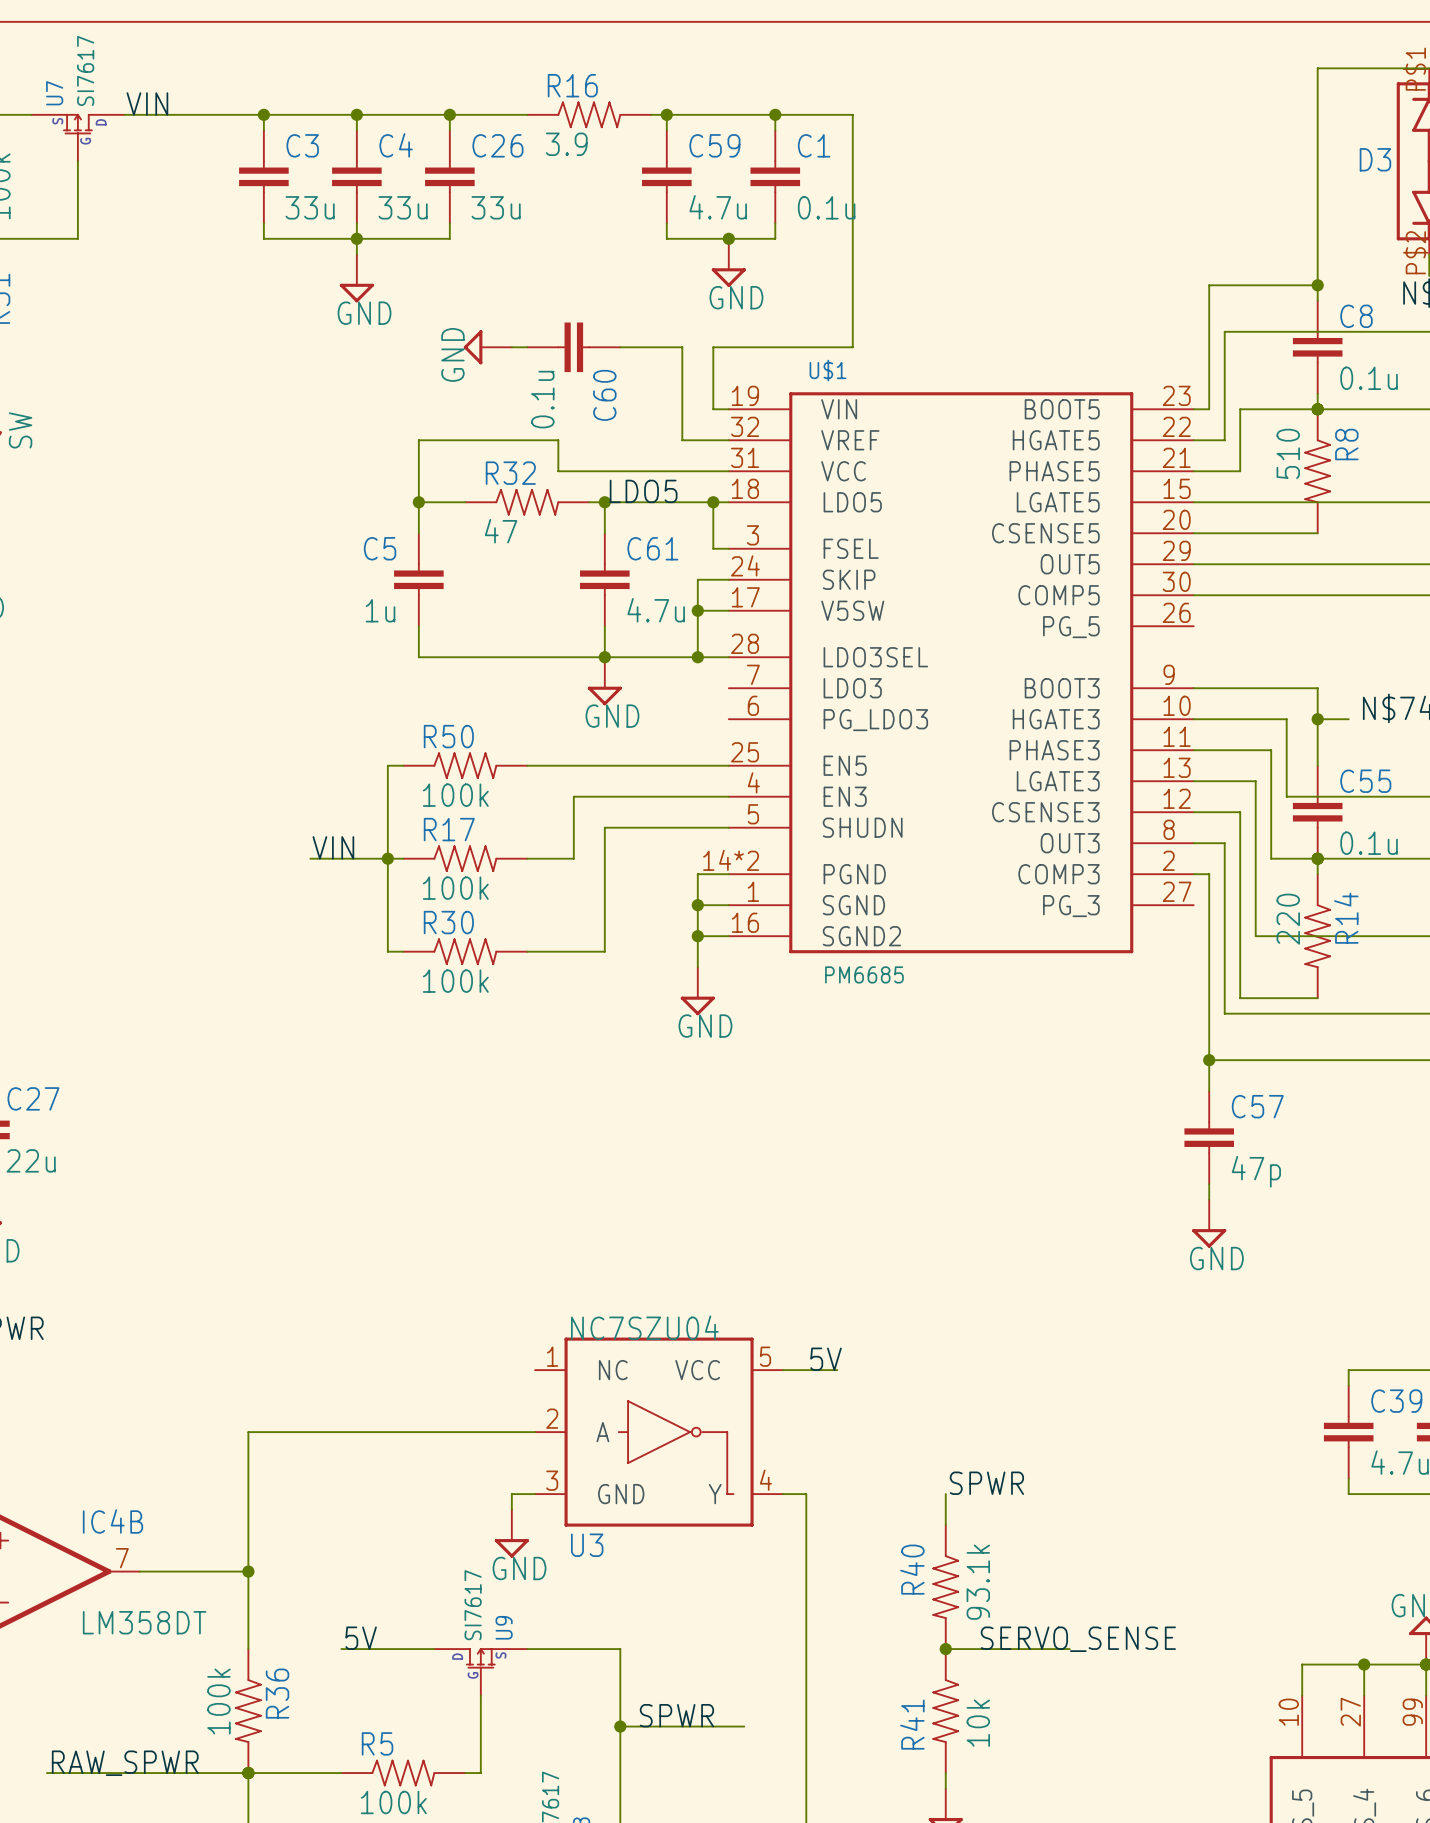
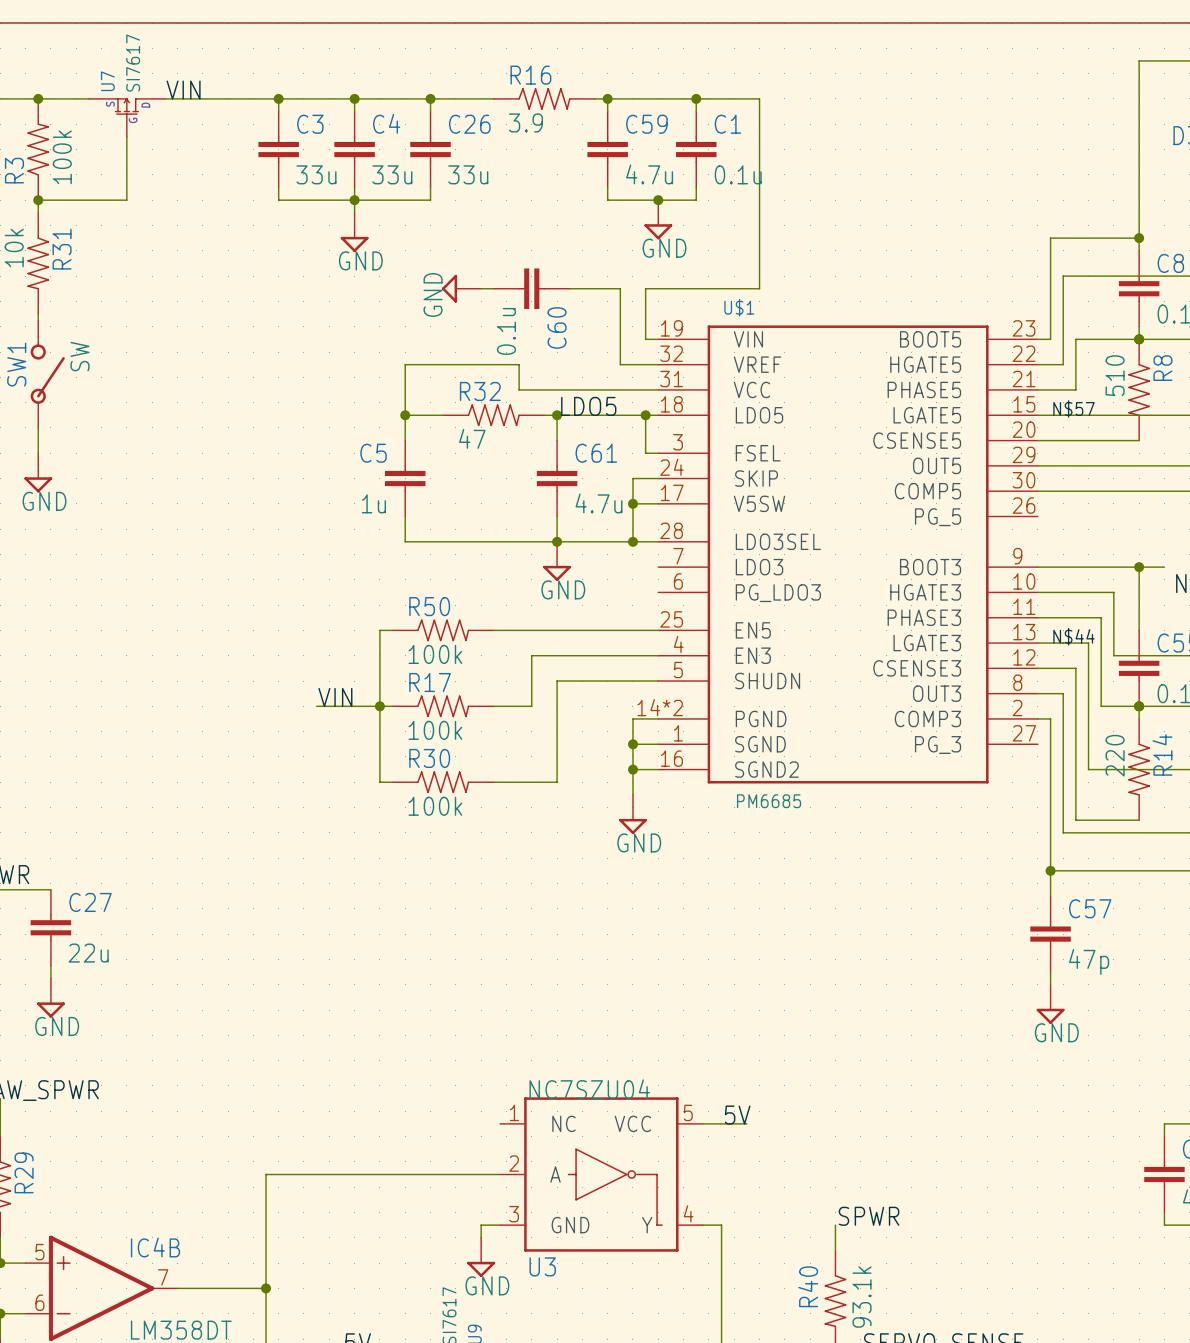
label: none -> N$57 (1074, 408)
wire: (1317, 719) (1348, 719) -> (1139, 567) (1164, 567)
junction position: (1317, 719) -> (1139, 567)
label: none -> N$44 (1074, 636)

